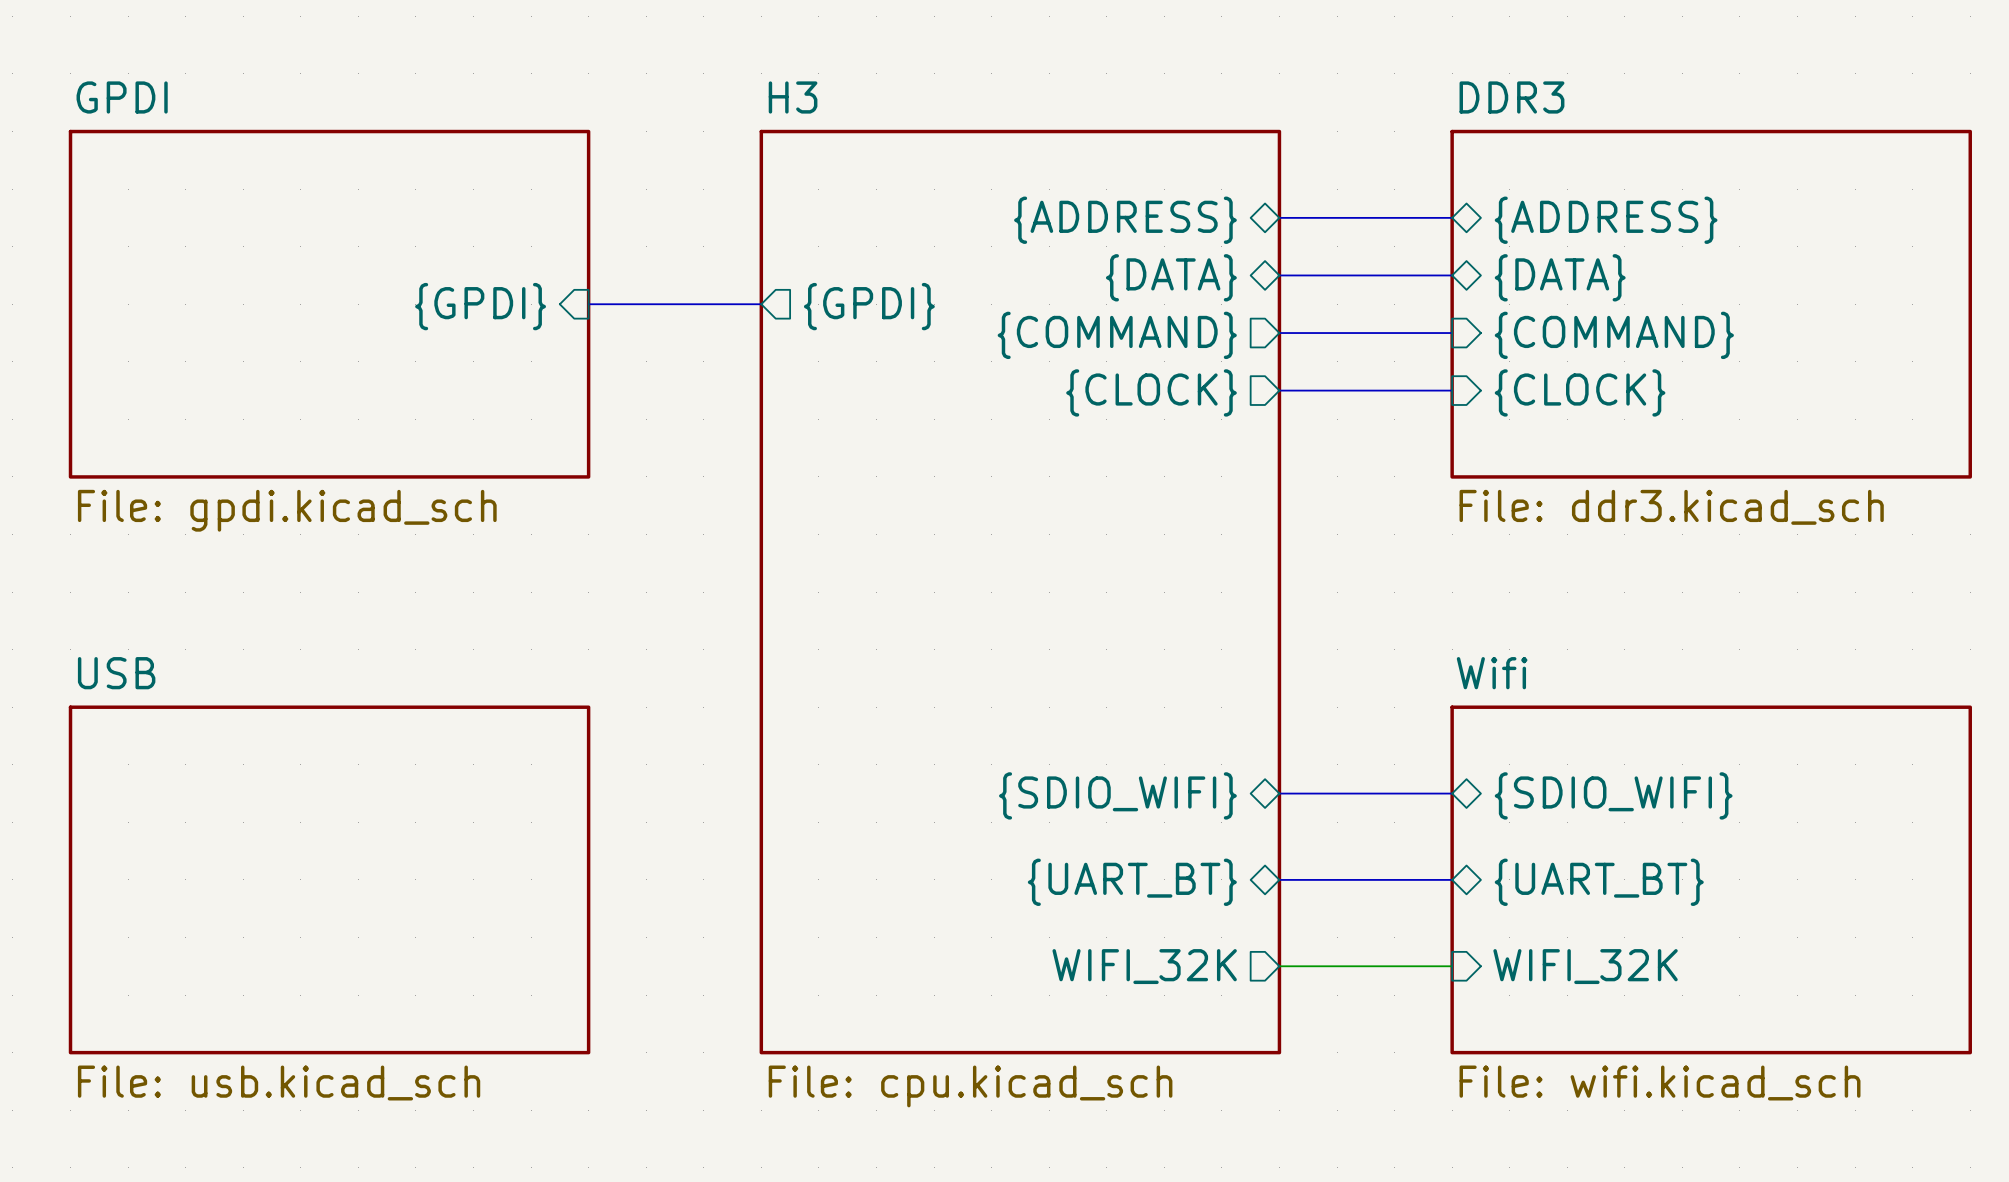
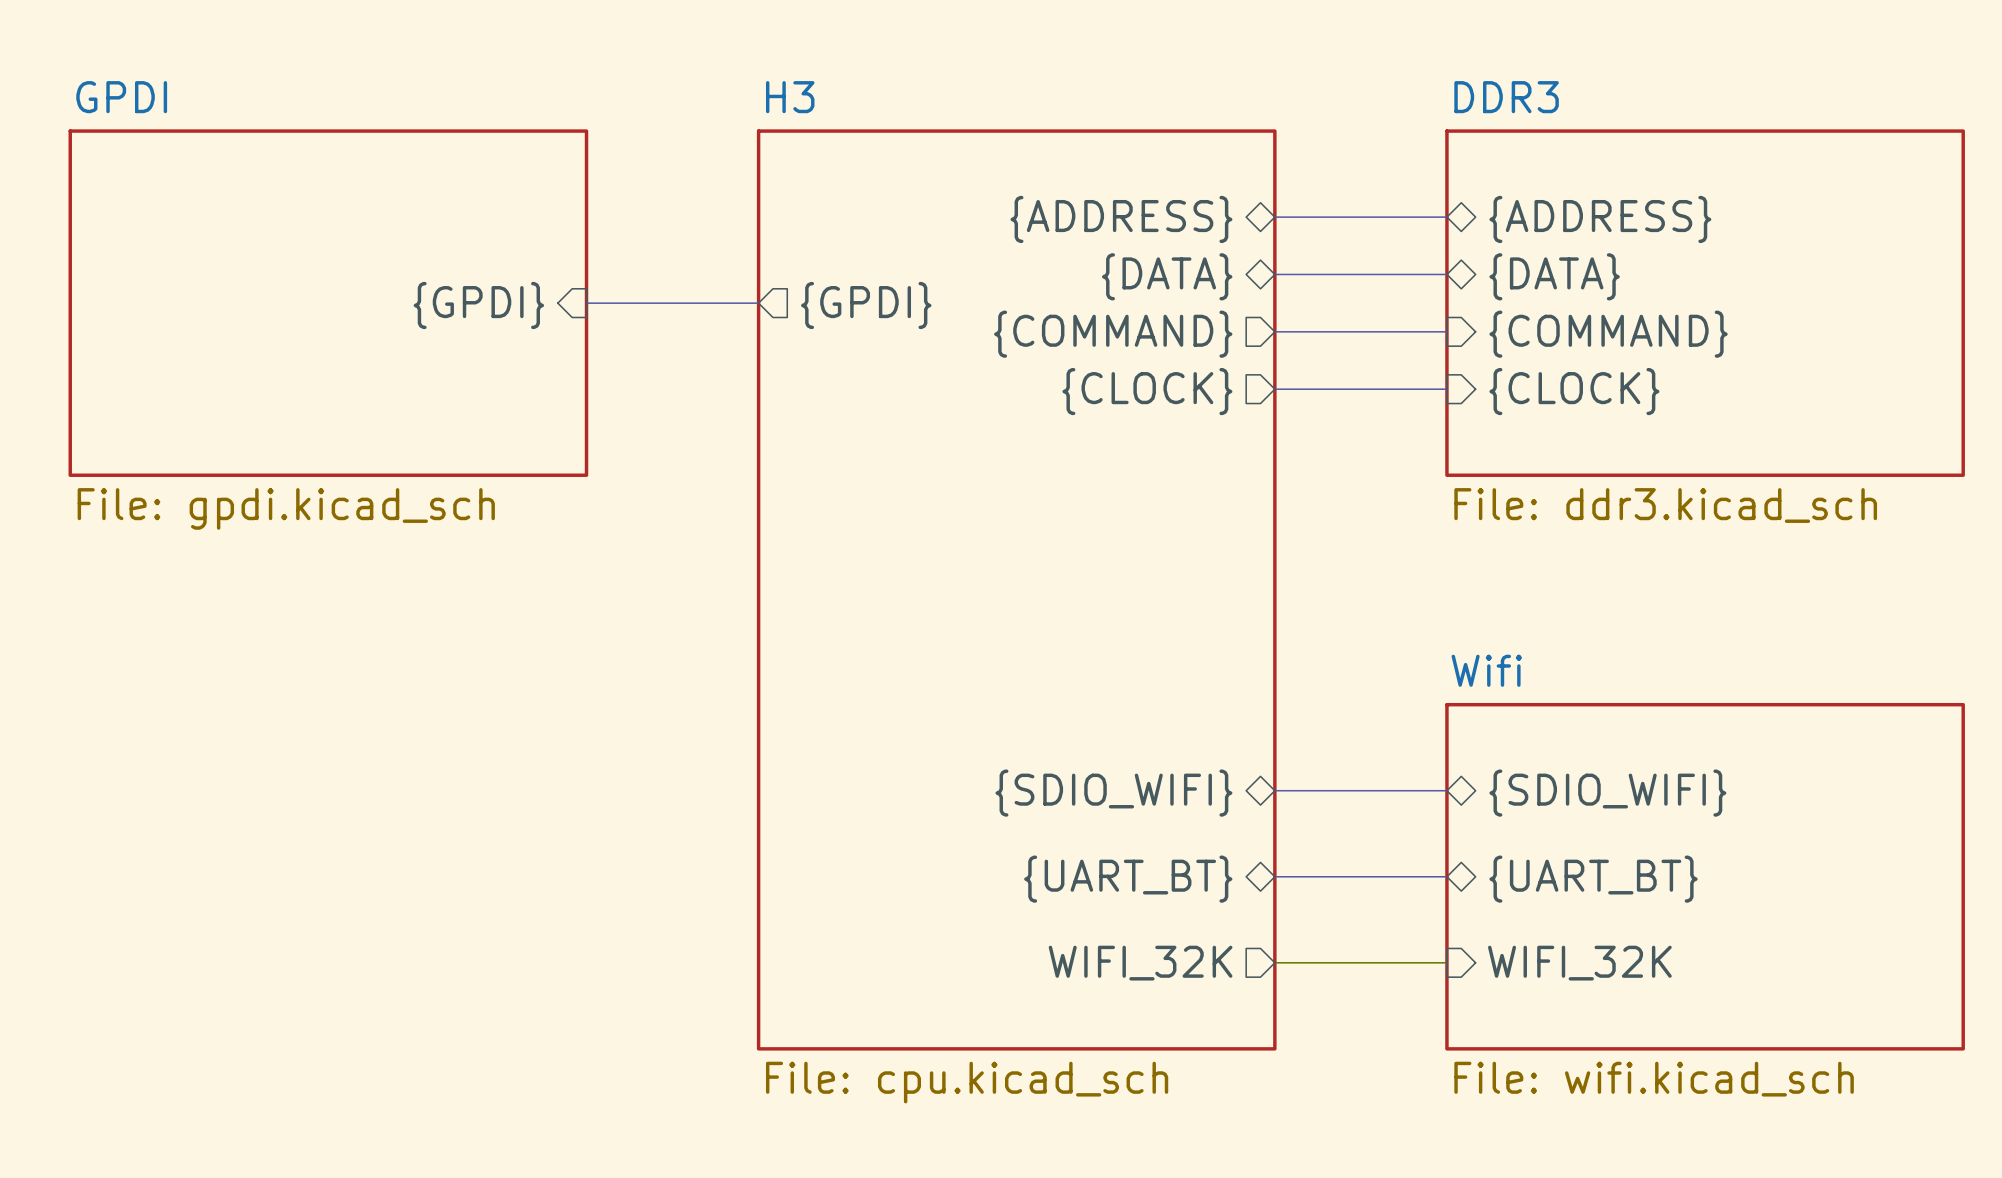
sheet USB: File: usb.kicad_sch (329, 879) -> none

